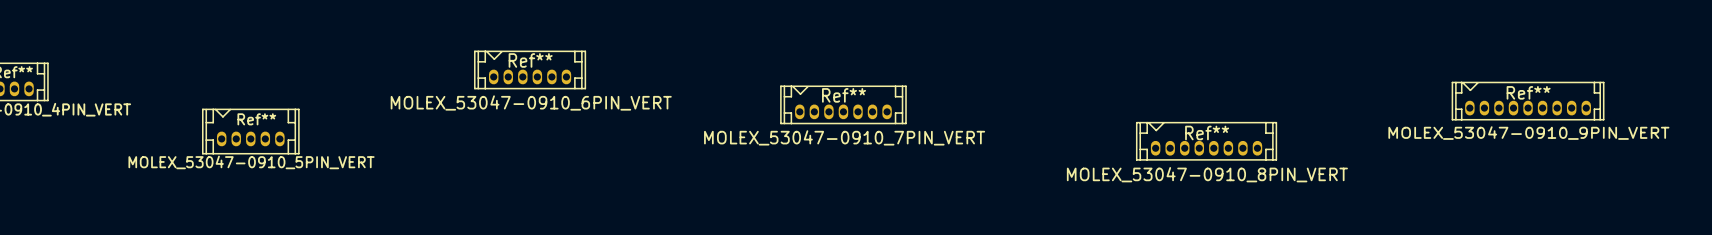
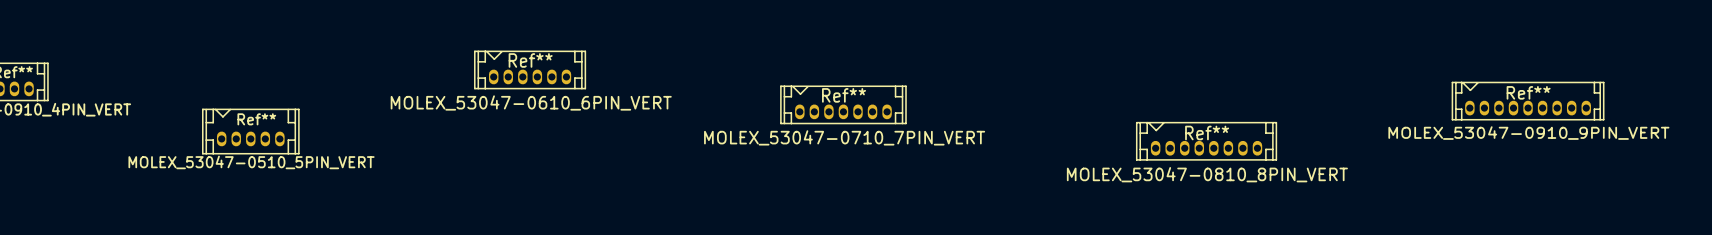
Ref** value: MOLEX_53047-0910_6PIN_VERT (531, 102) -> MOLEX_53047-0610_6PIN_VERT (531, 102)
Ref** value: MOLEX_53047-0910_7PIN_VERT (844, 137) -> MOLEX_53047-0710_7PIN_VERT (844, 137)
Ref** value: MOLEX_53047-0910_5PIN_VERT (251, 162) -> MOLEX_53047-0510_5PIN_VERT (251, 162)
Ref** value: MOLEX_53047-0910_8PIN_VERT (1207, 174) -> MOLEX_53047-0810_8PIN_VERT (1207, 174)

